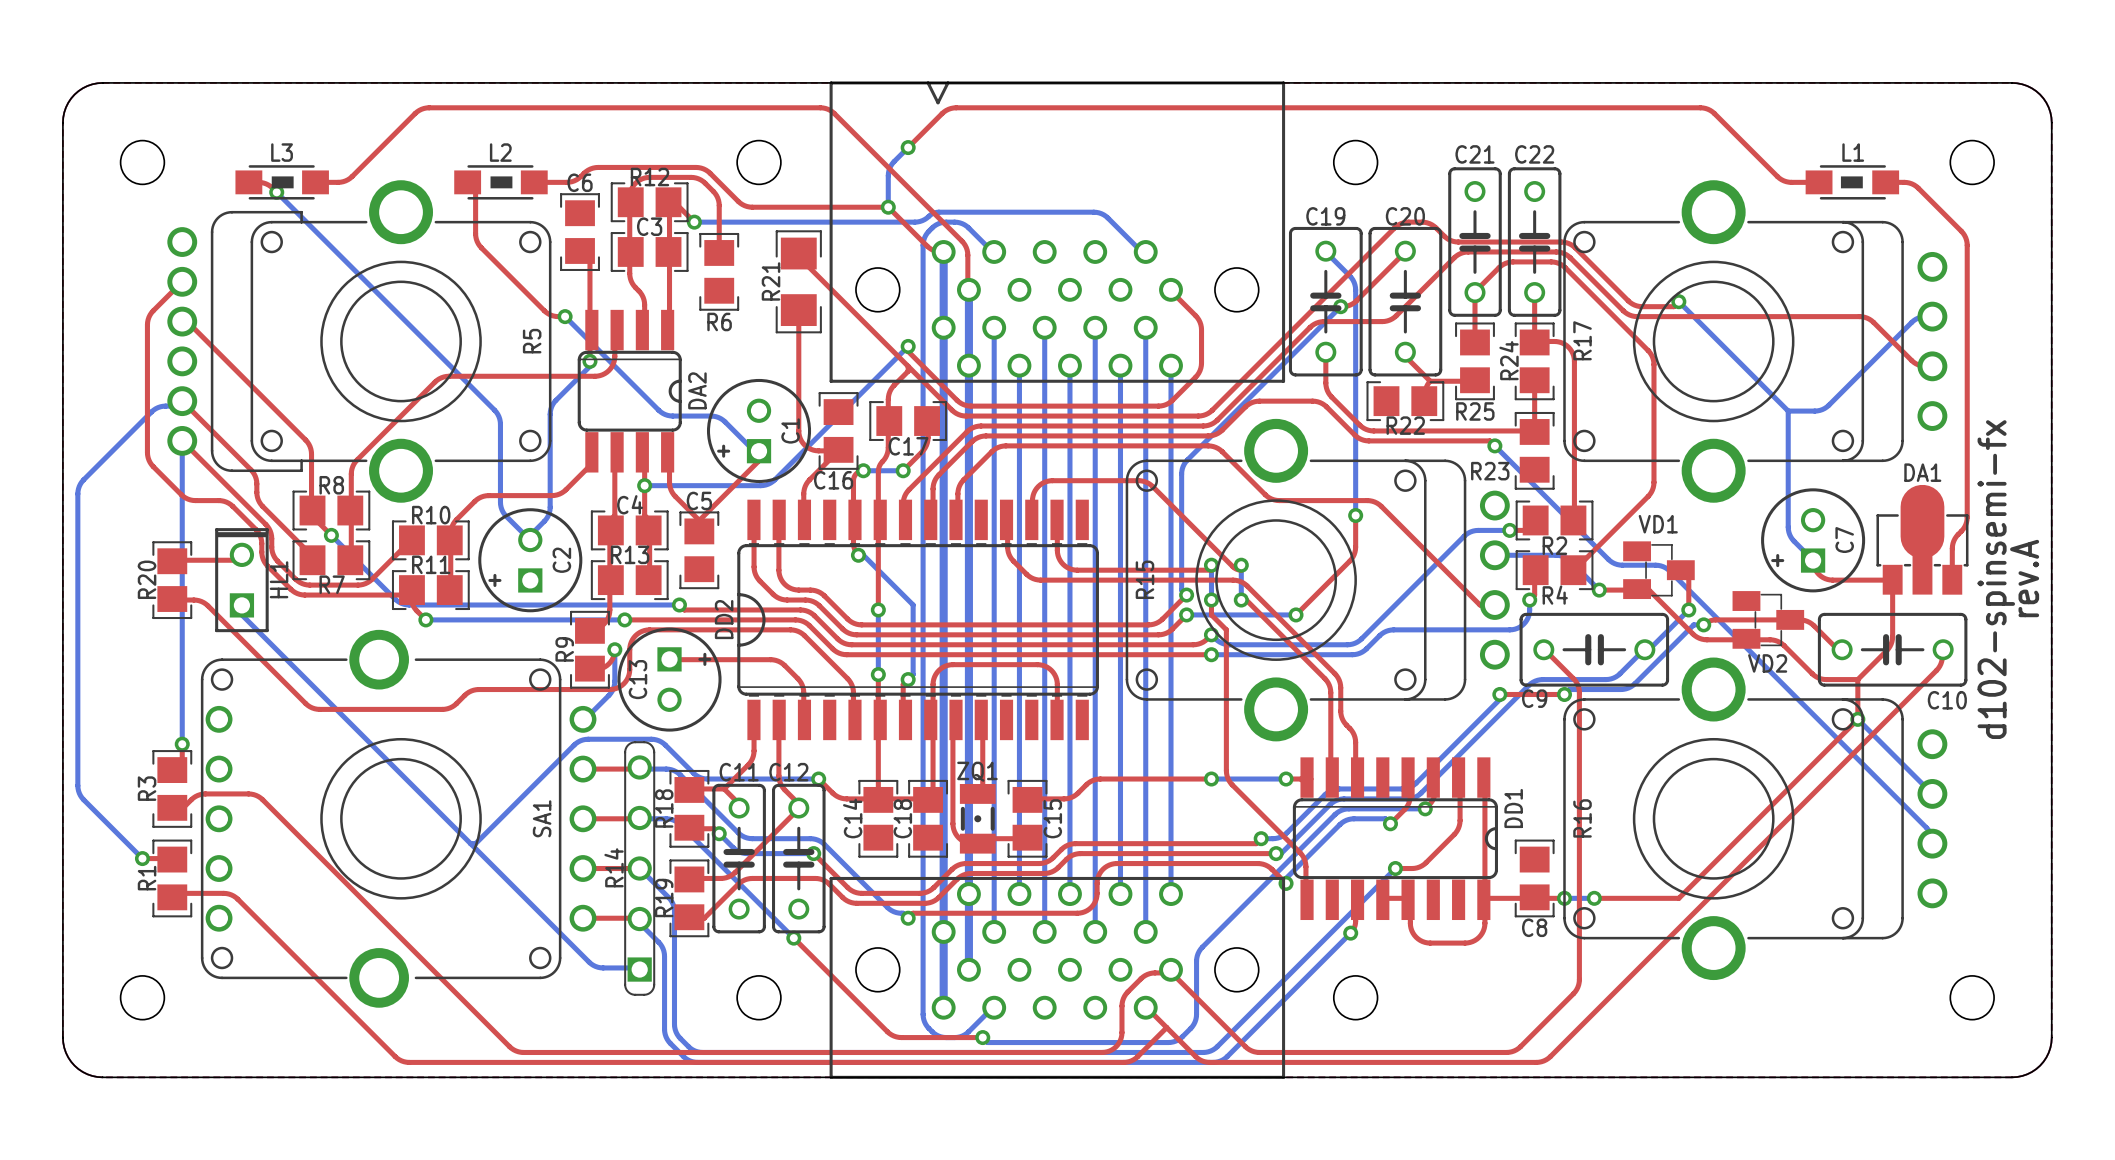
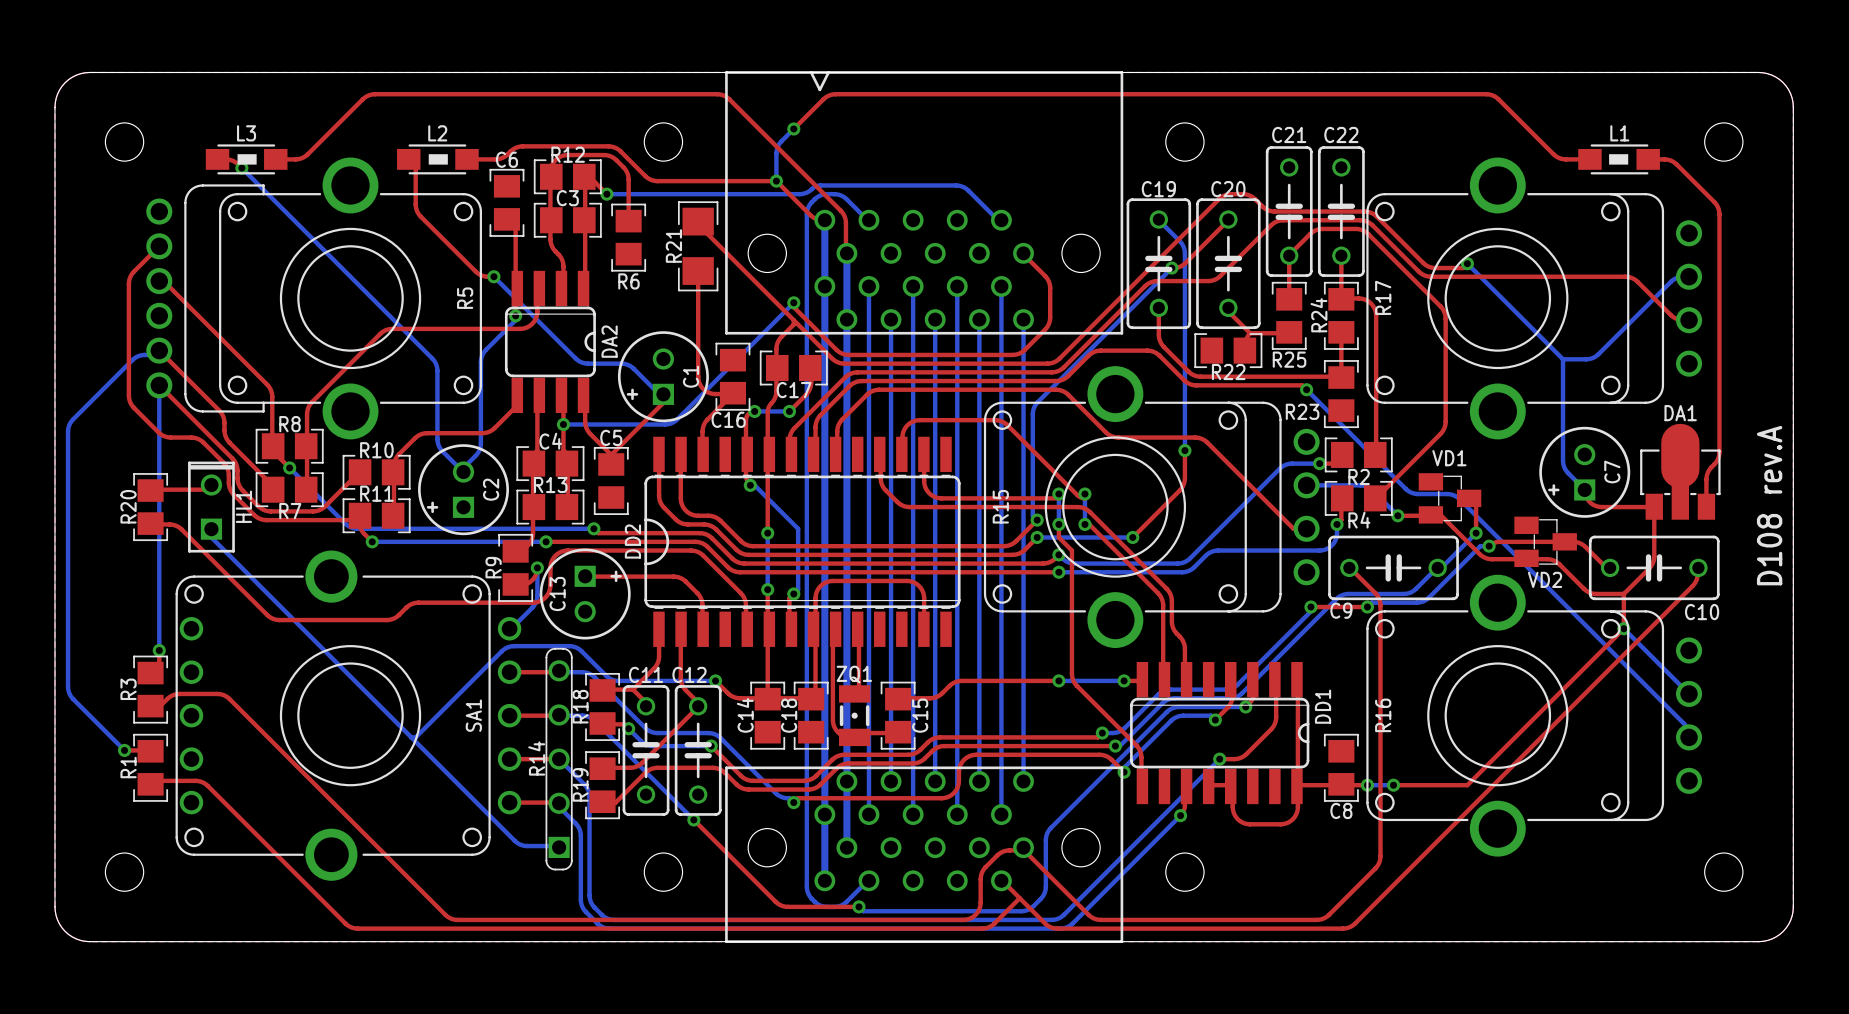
part value: rev.A (2024, 578) -> D108 rev.A (1769, 505)
part text: d102-spinsemi-fx (1996, 579) -> none

